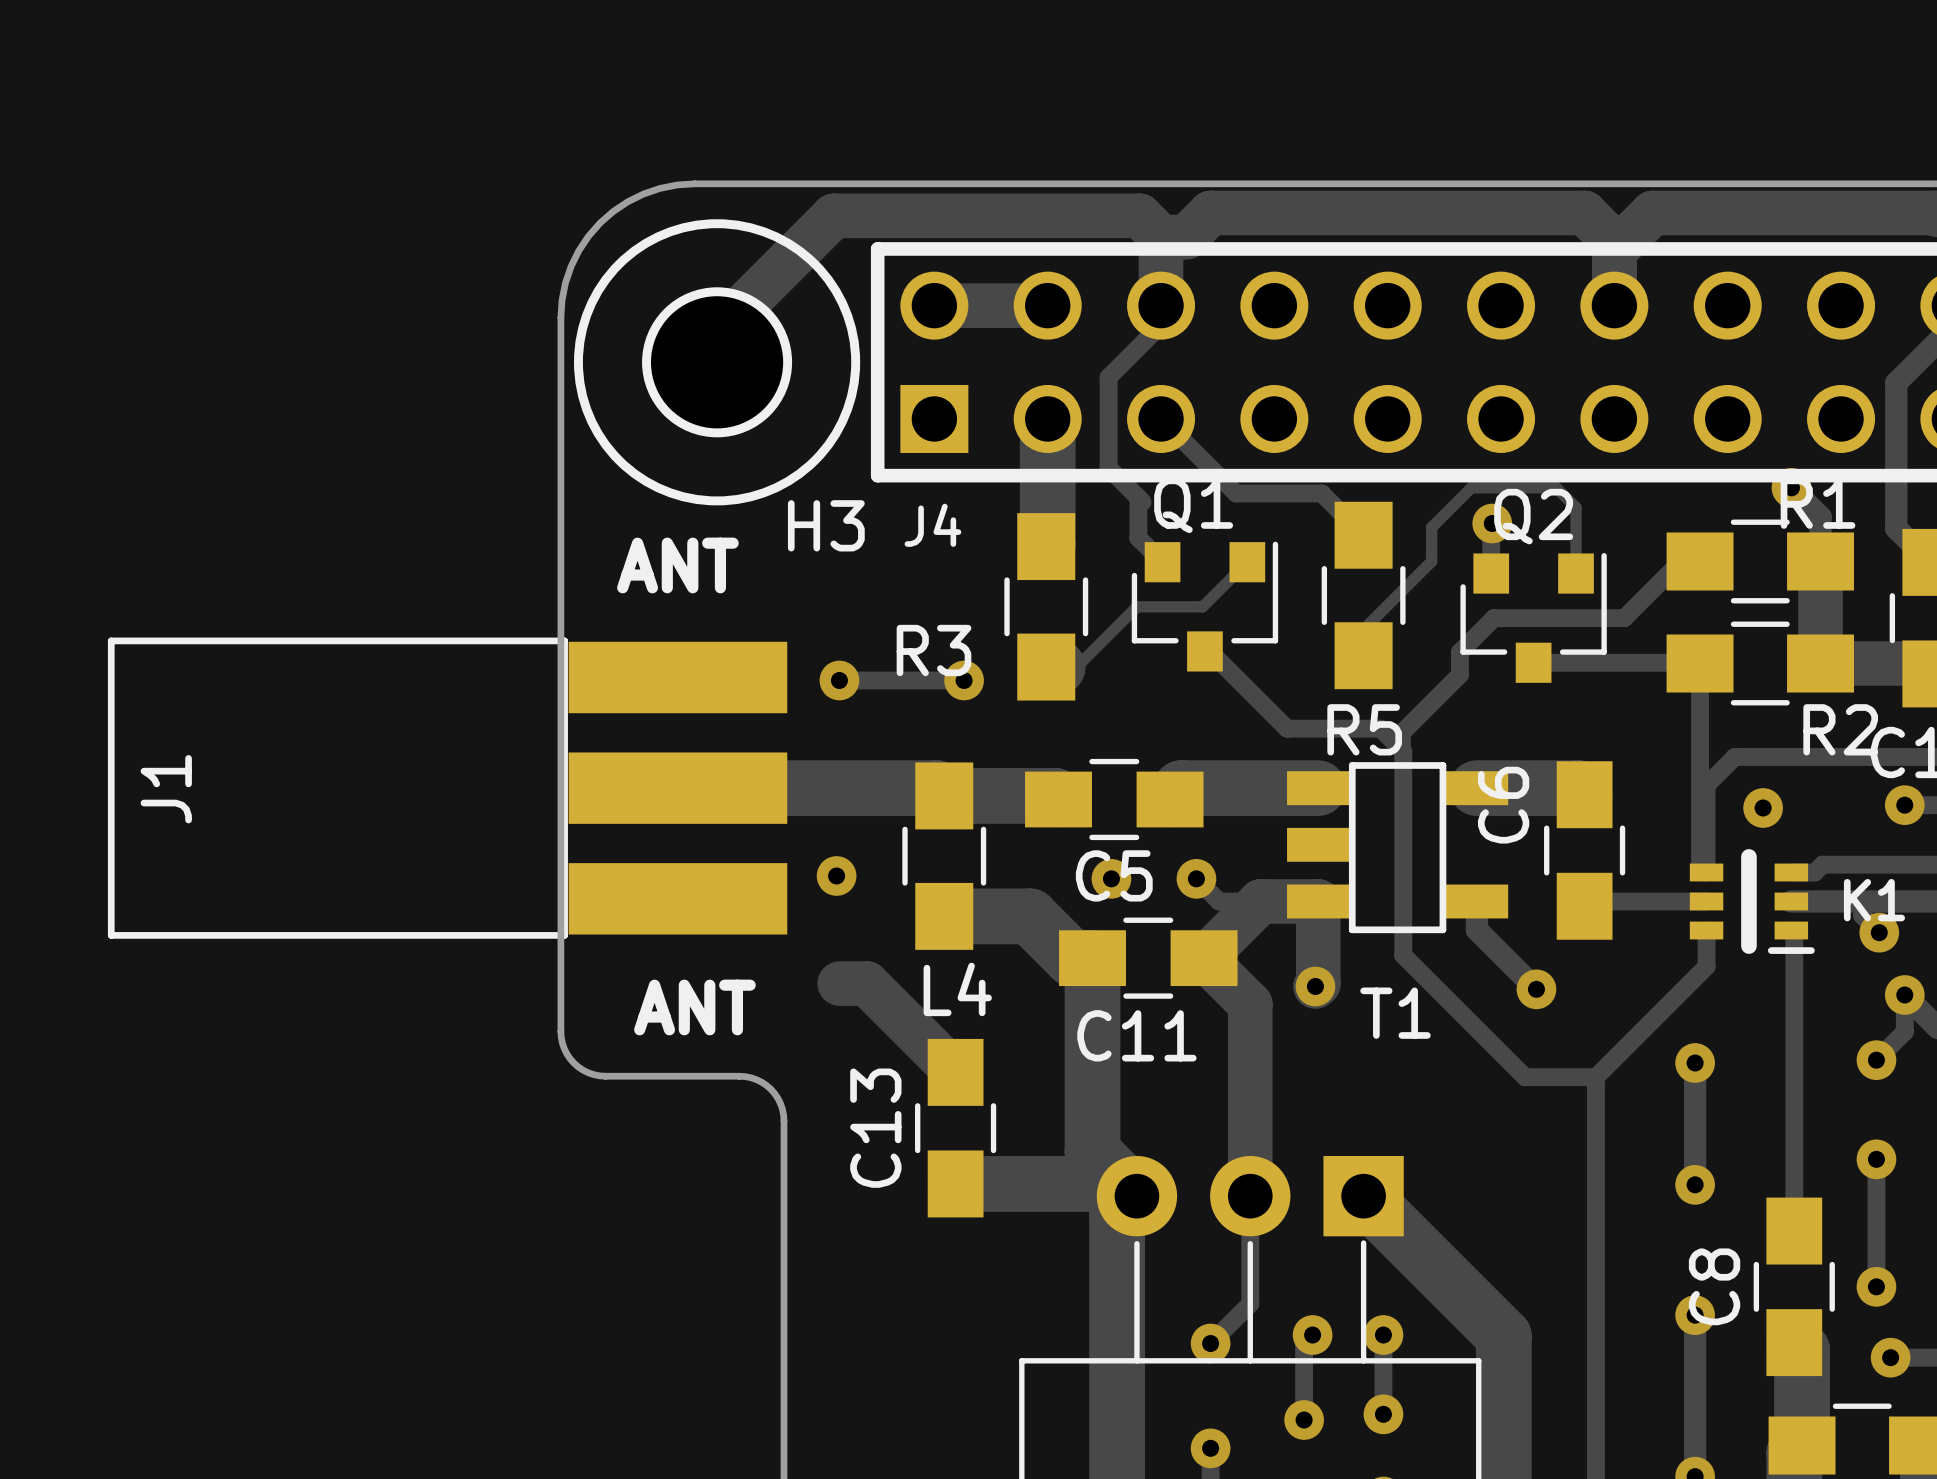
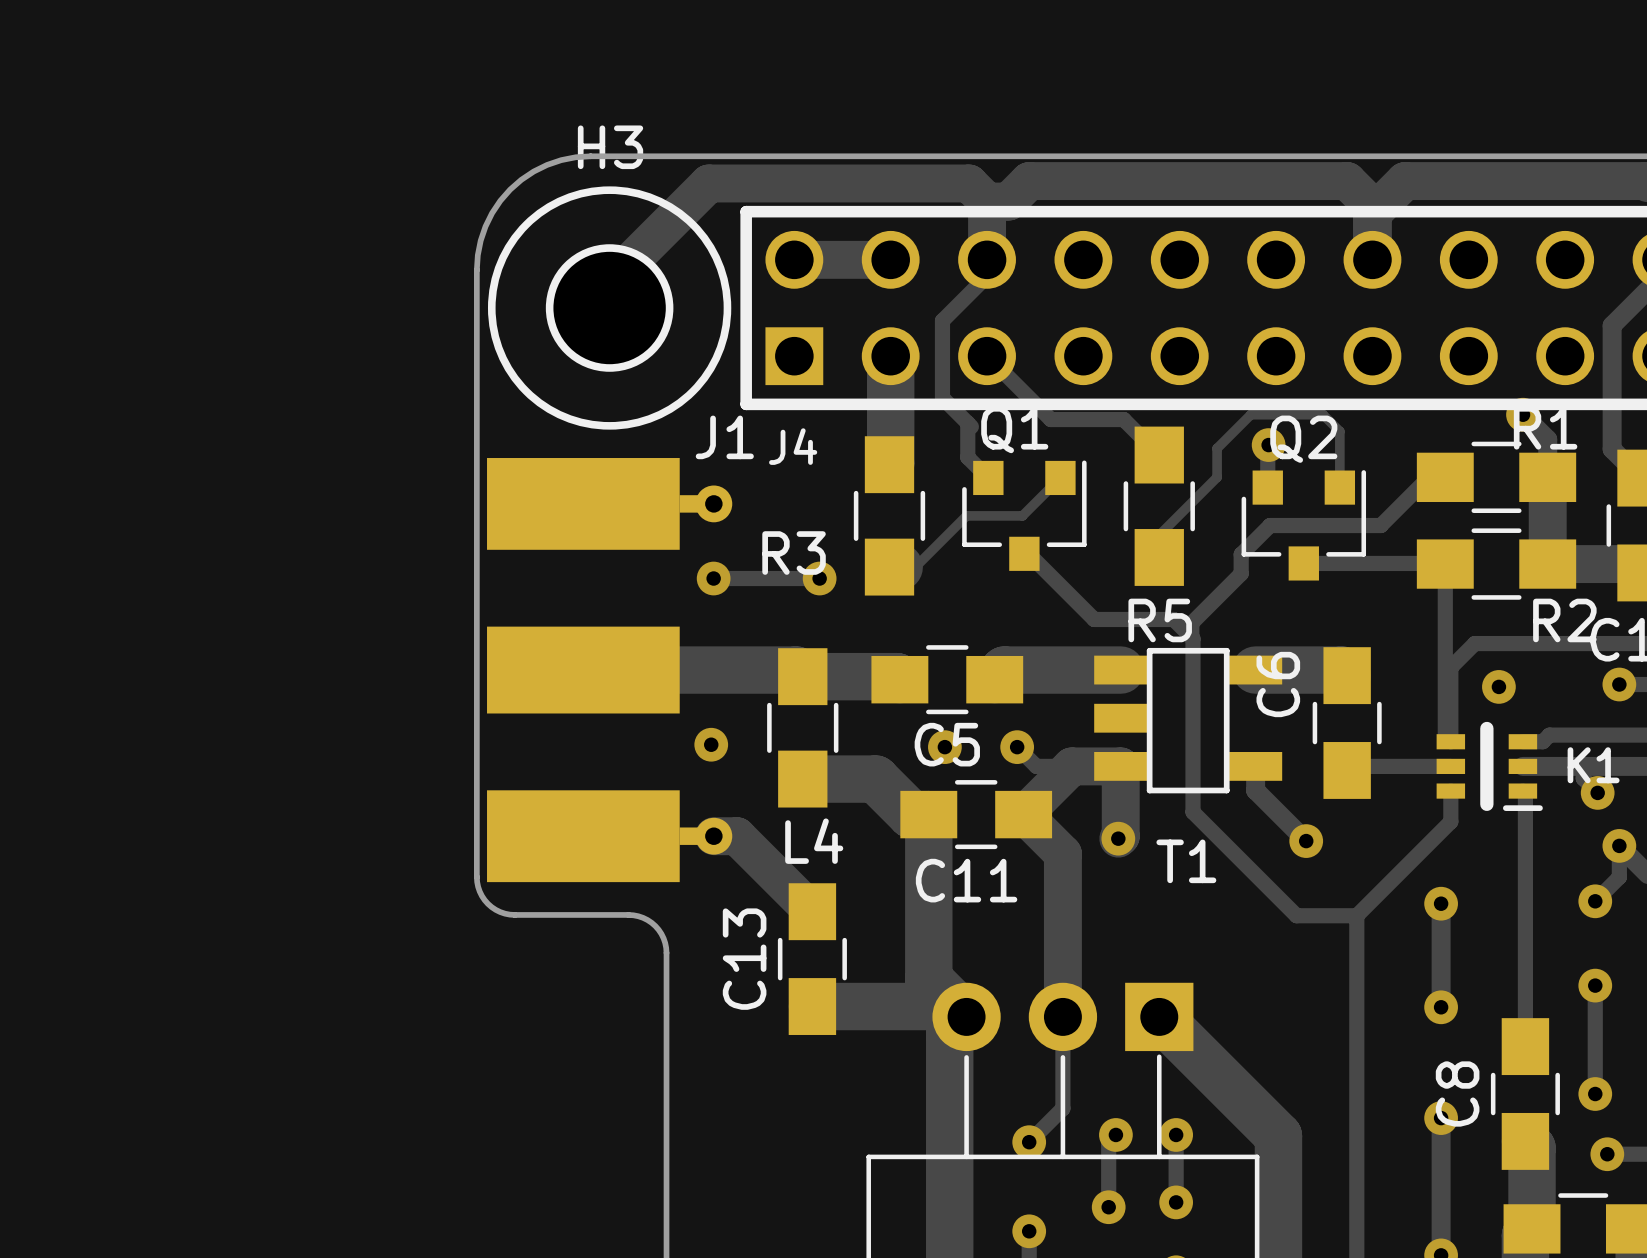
H3 name position: H3 (826, 525) -> H3 (610, 147)
text: ANT (677, 565) -> none
J1 footprint: [107, 637, 788, 939] -> [487, 458, 733, 883]
J1 name position: J1 (166, 789) -> J1 (724, 437)
text: ANT (694, 1007) -> none

